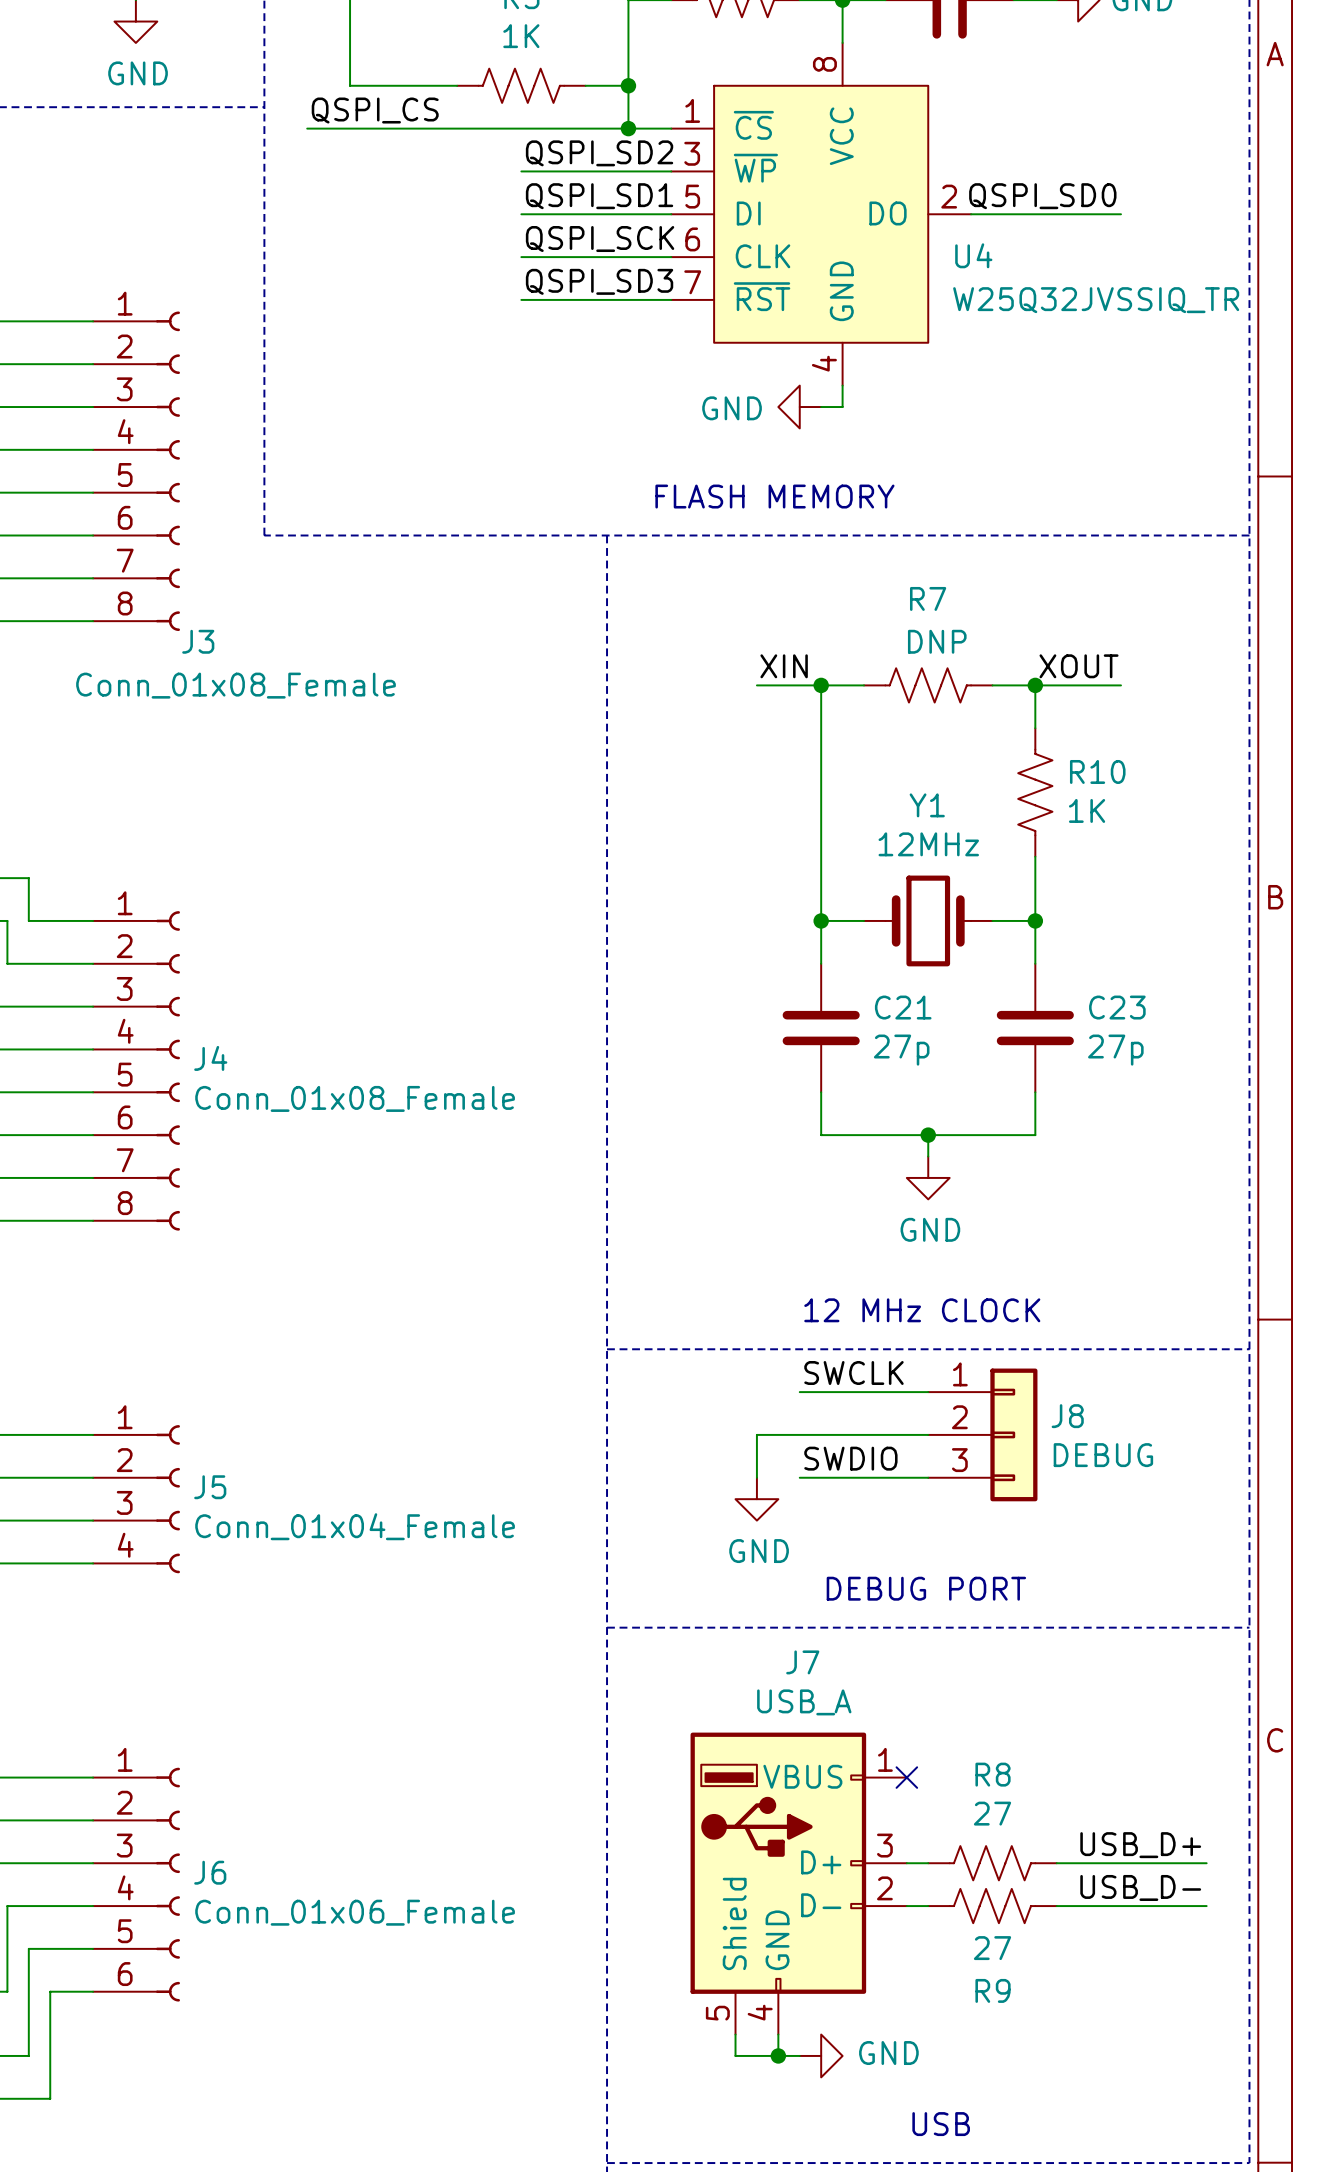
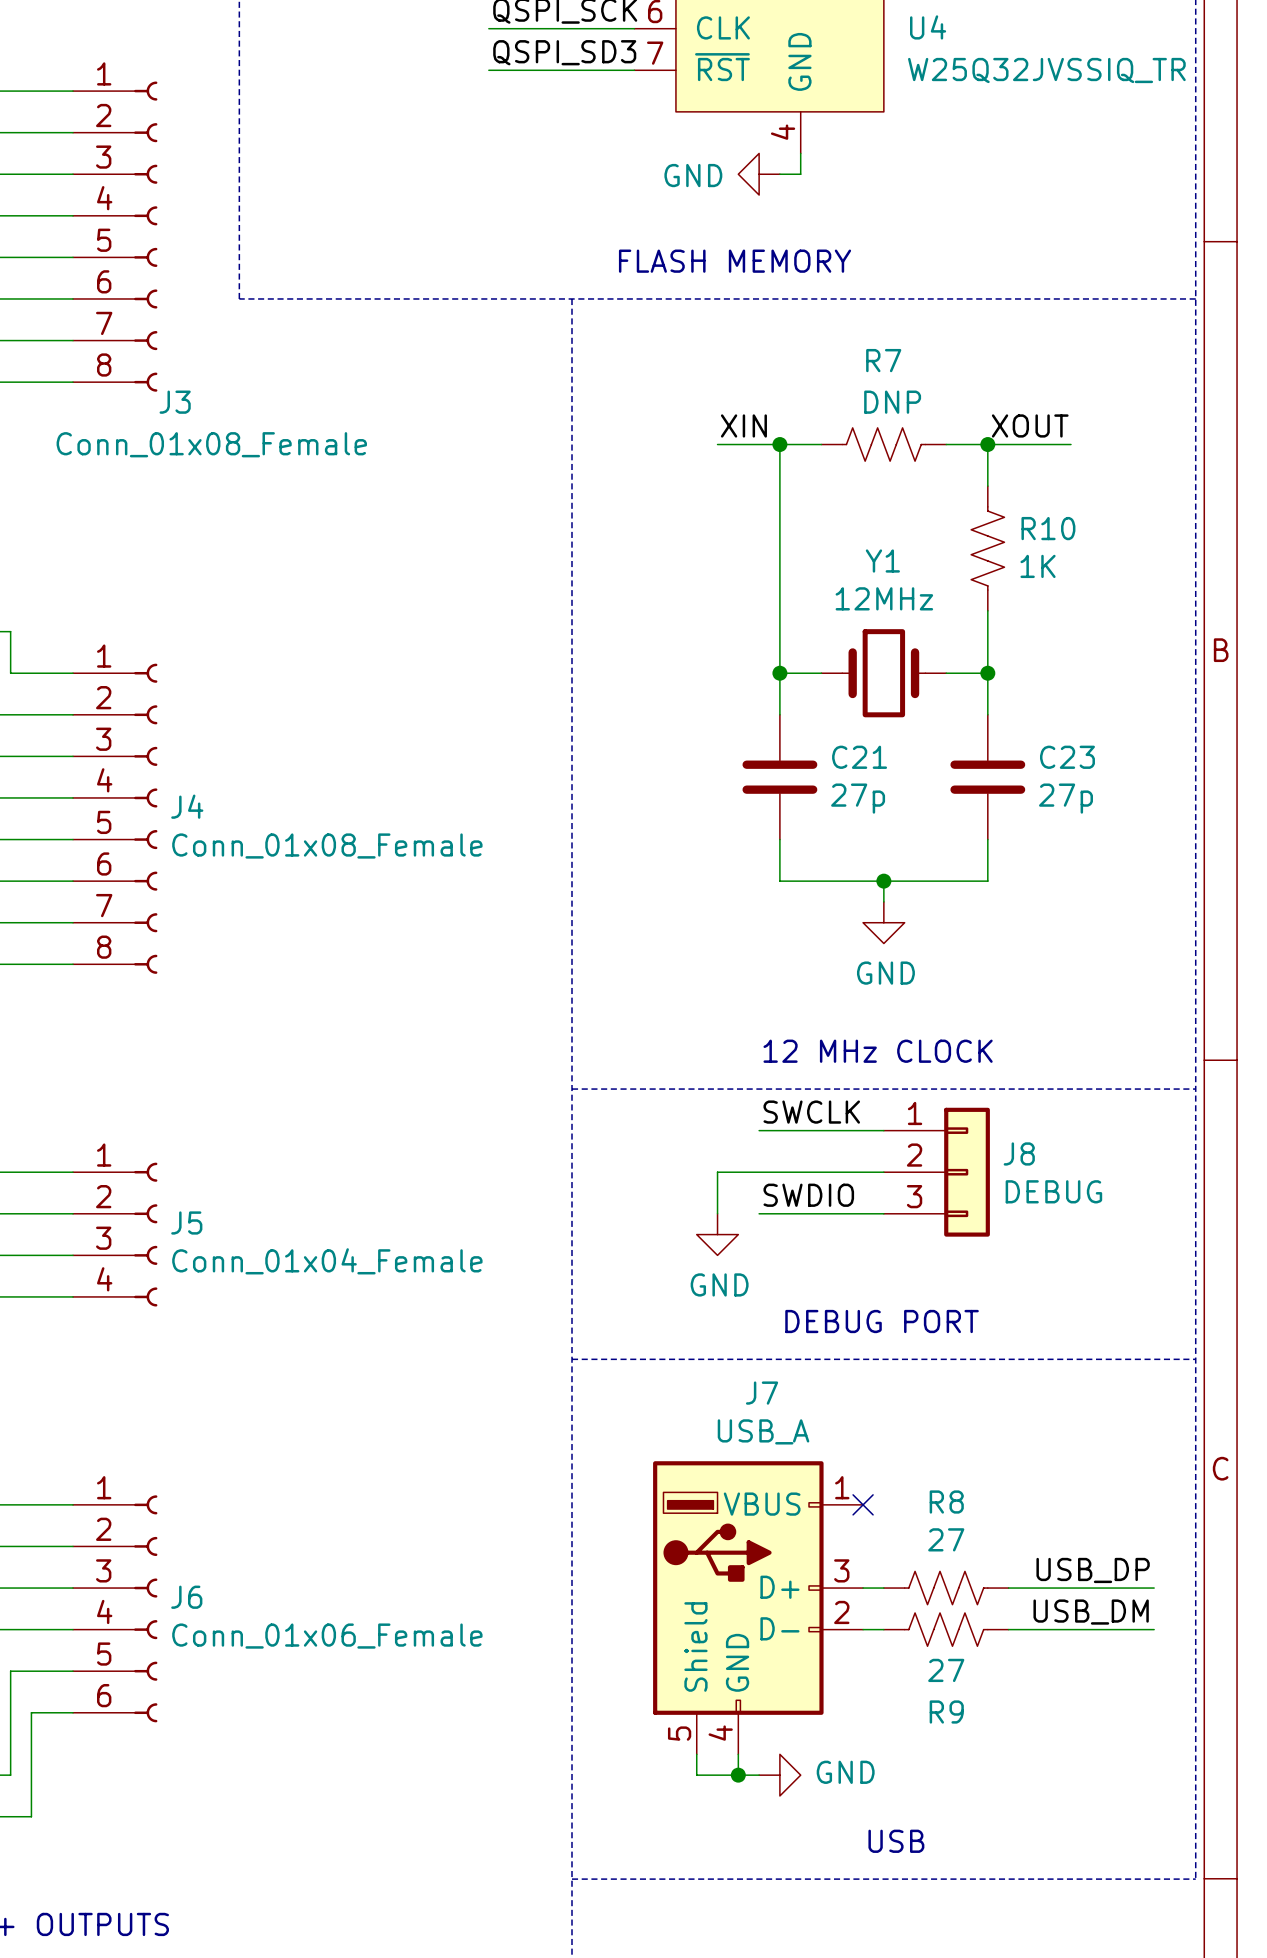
label: USB_D+ (1140, 1845) -> USB_DP (1093, 1570)
label: USB_D- (1140, 1887) -> USB_DM (1091, 1612)

